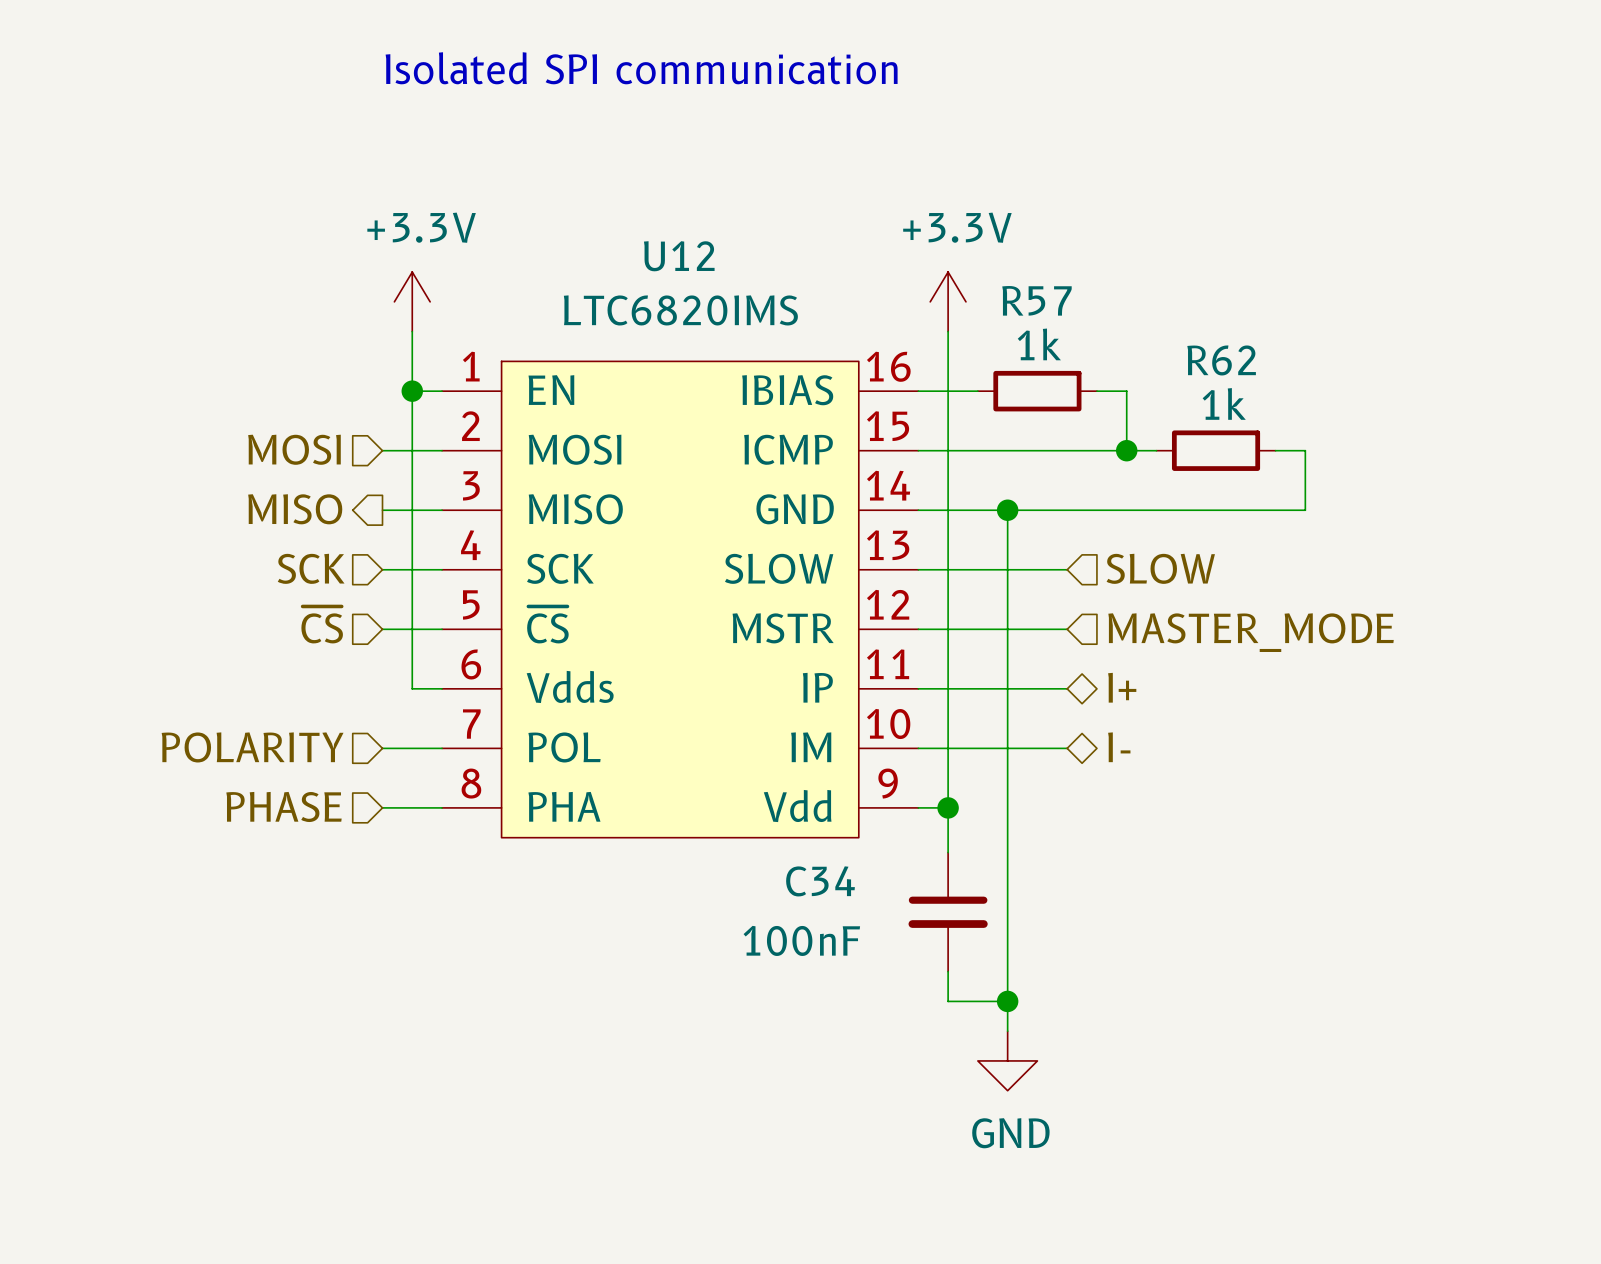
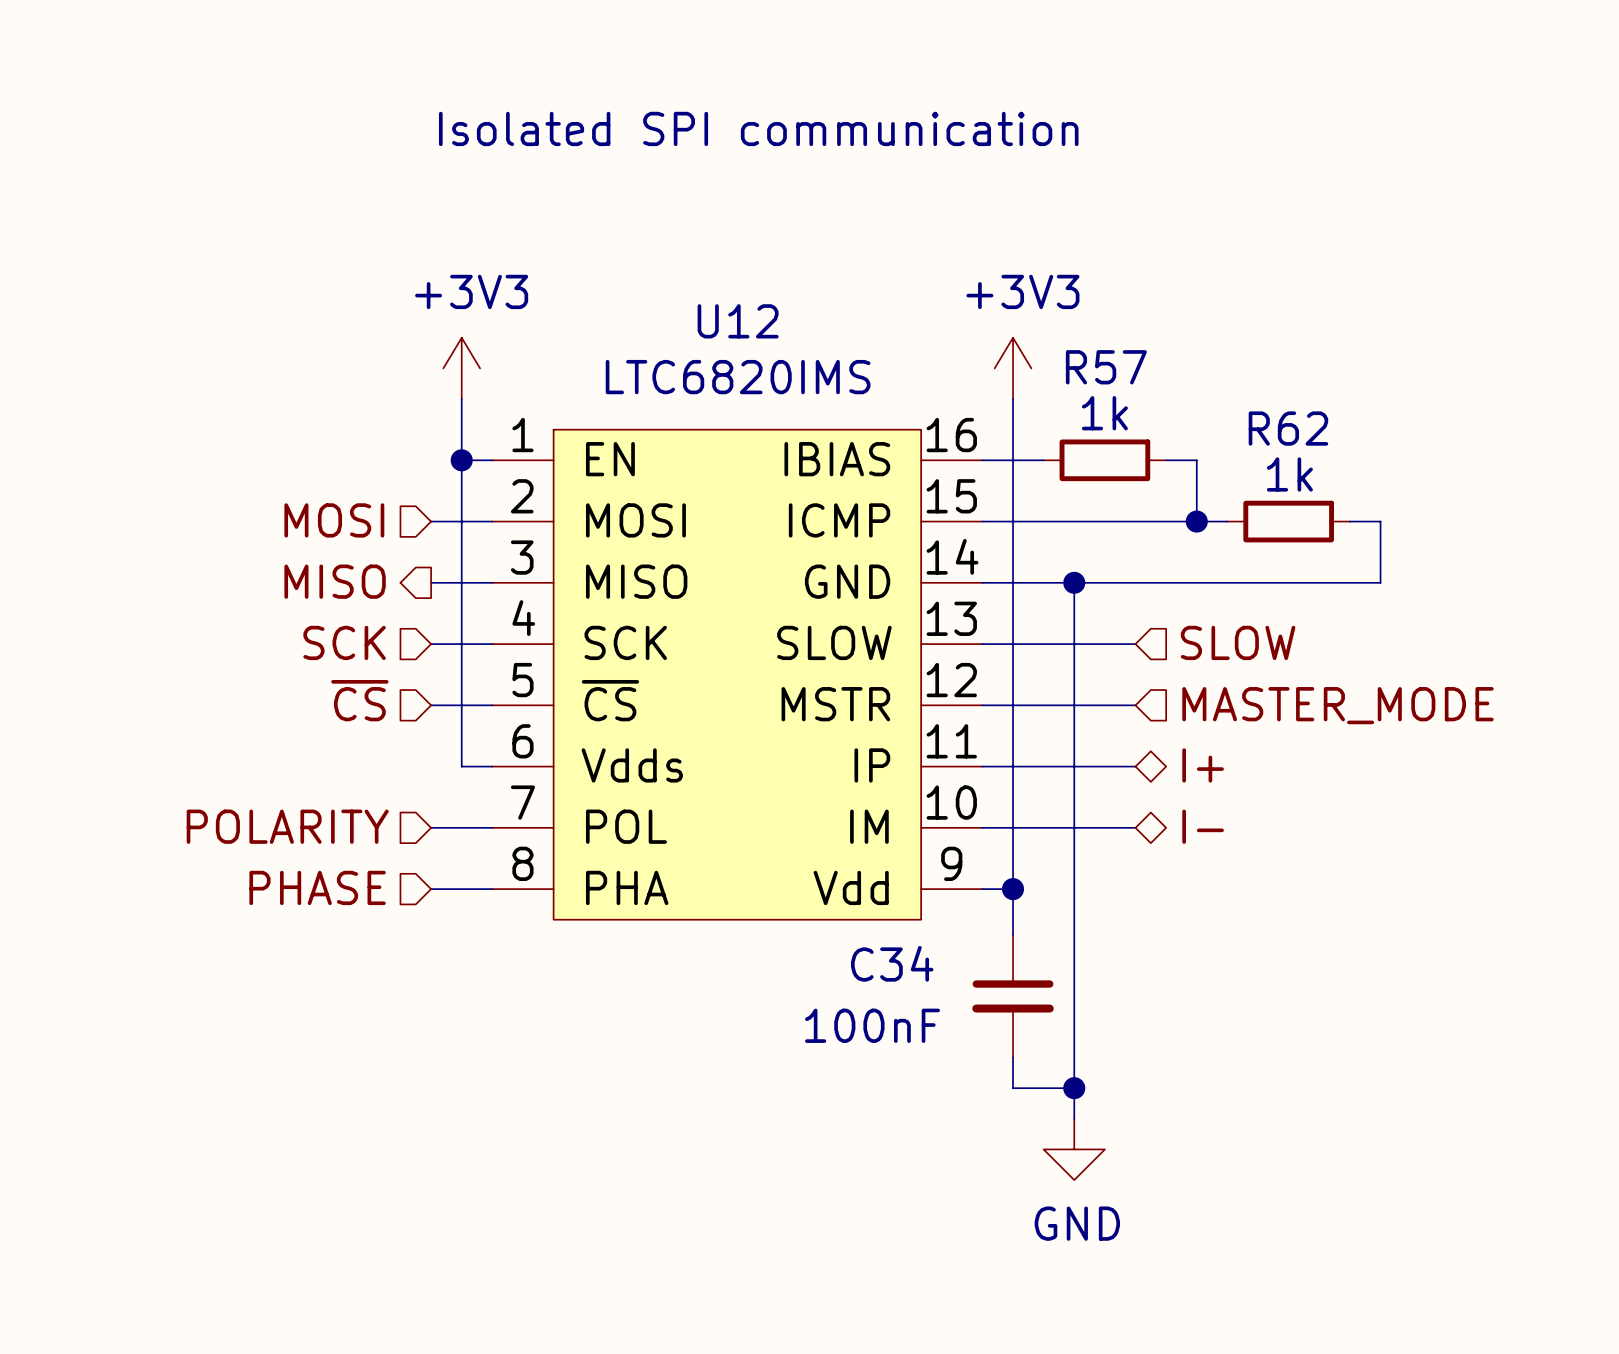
power symbol: +3.3V (412, 301) -> +3V3 (461, 368)
power symbol: +3.3V (948, 301) -> +3V3 (1013, 368)

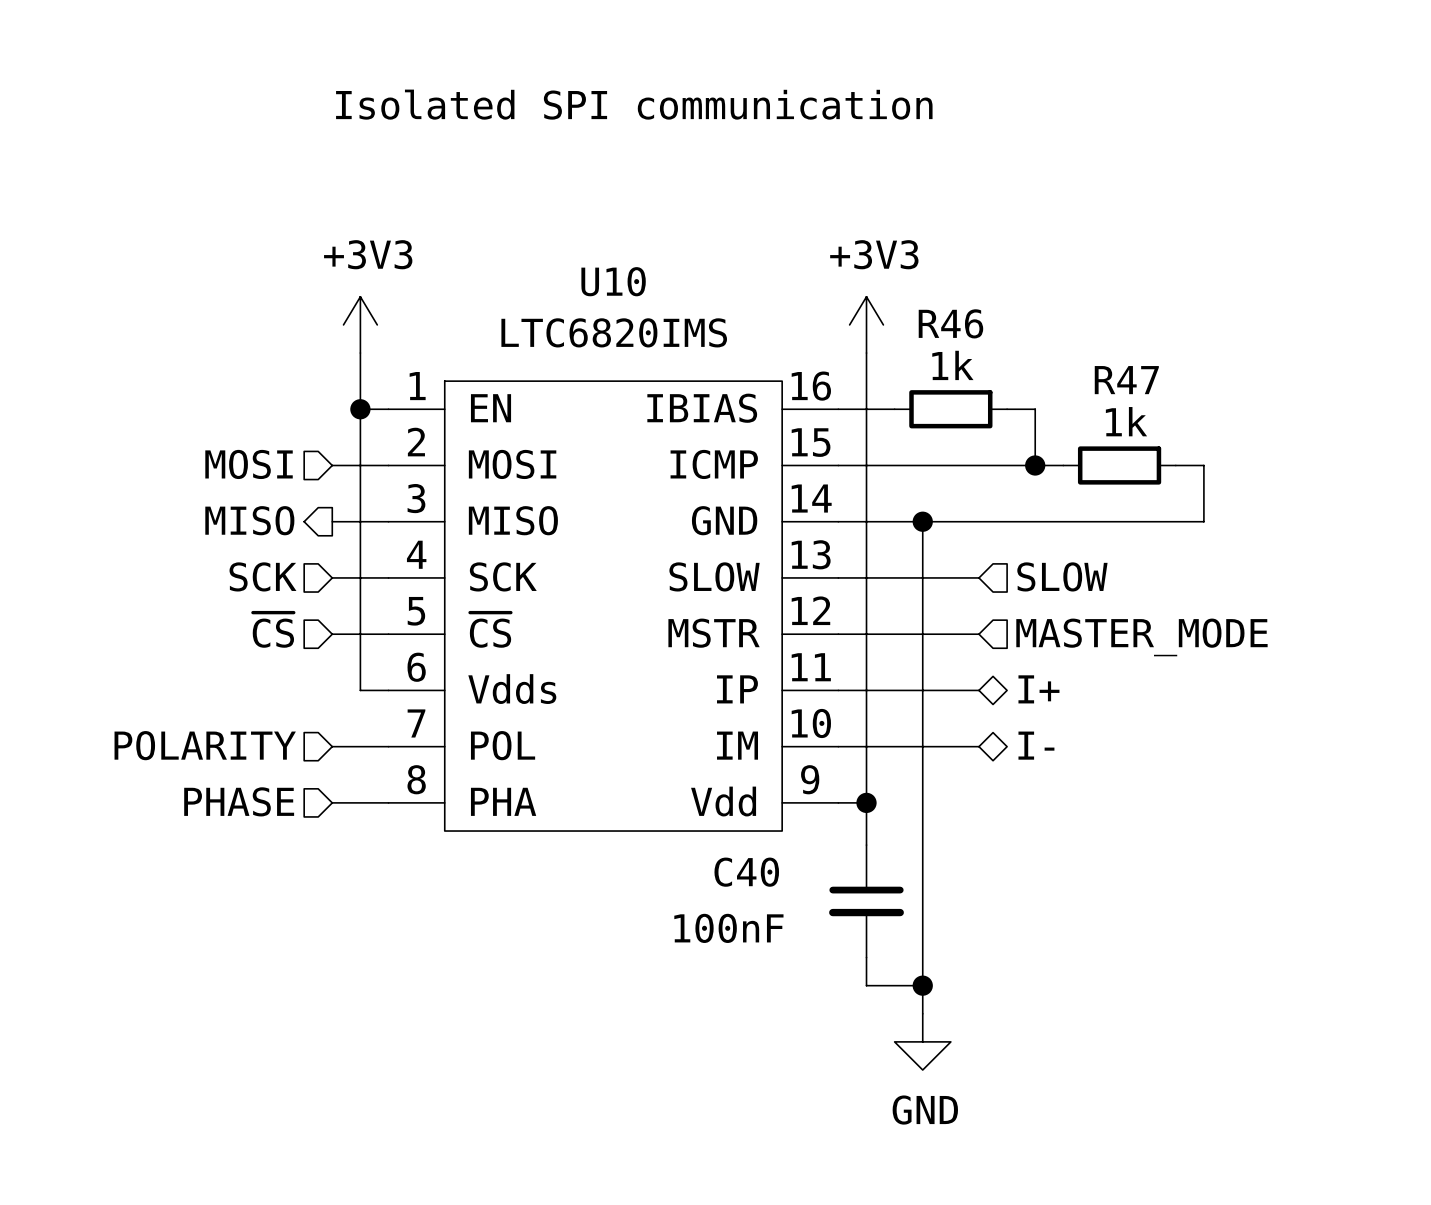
U12 name: U12 (738, 321) -> U10 (613, 281)
R57 name: R57 (1106, 367) -> R46 (950, 323)
R62 name: R62 (1288, 428) -> R47 (1126, 380)
C34 name: C34 (892, 963) -> C40 (746, 872)

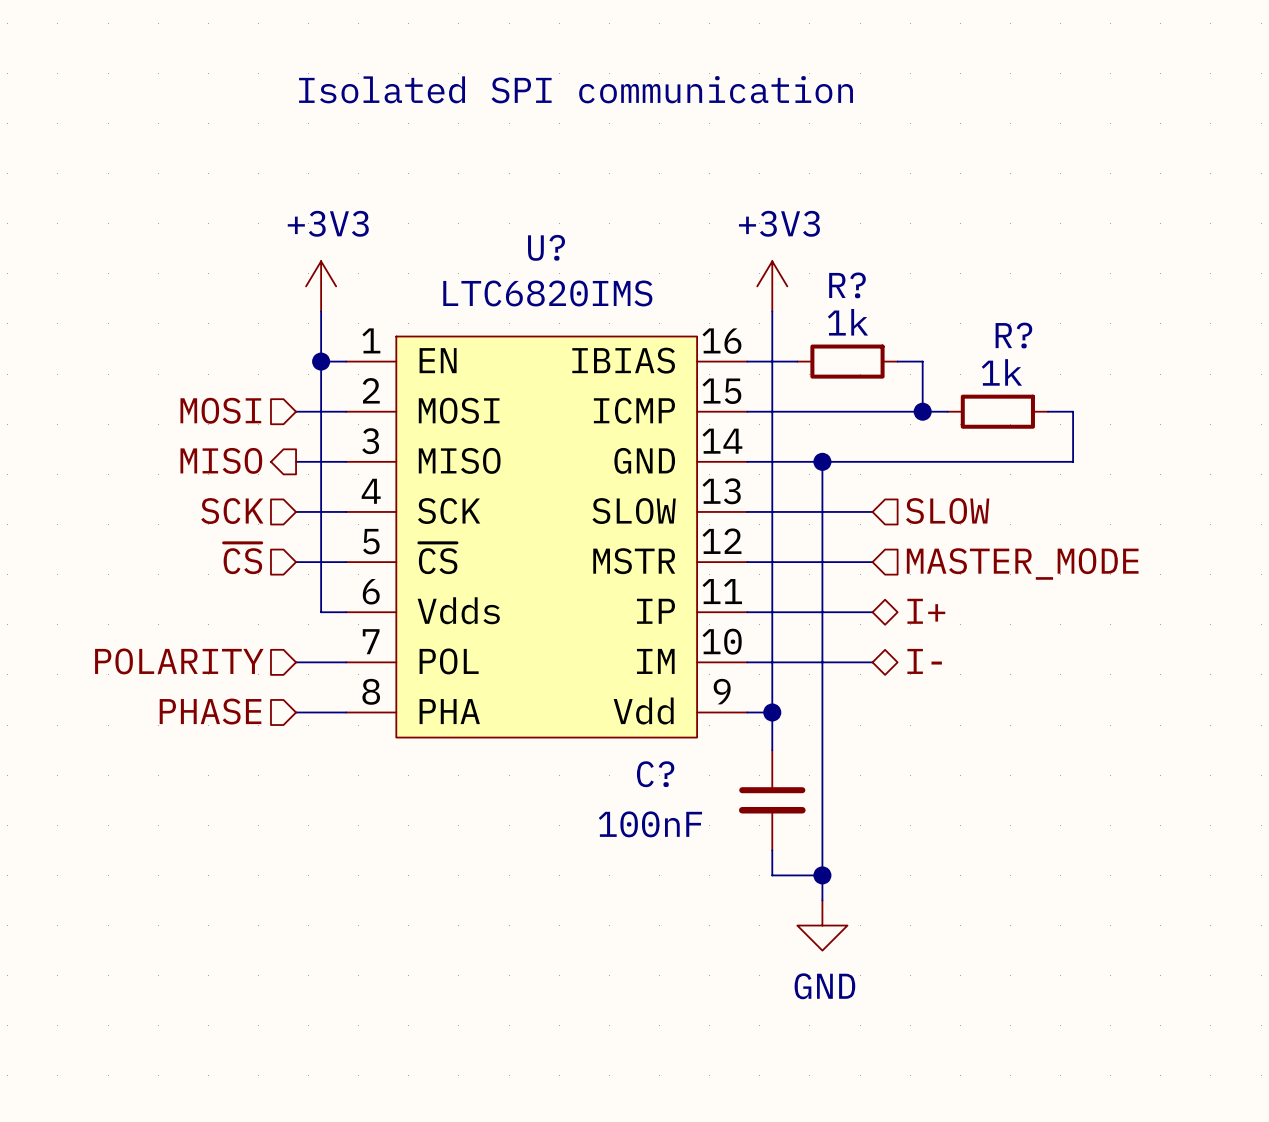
U10 name: U10 (613, 281) -> U? (546, 247)
R46 name: R46 (950, 323) -> R? (847, 285)
R47 name: R47 (1126, 380) -> R? (1013, 335)
C40 name: C40 (746, 872) -> C? (655, 774)

